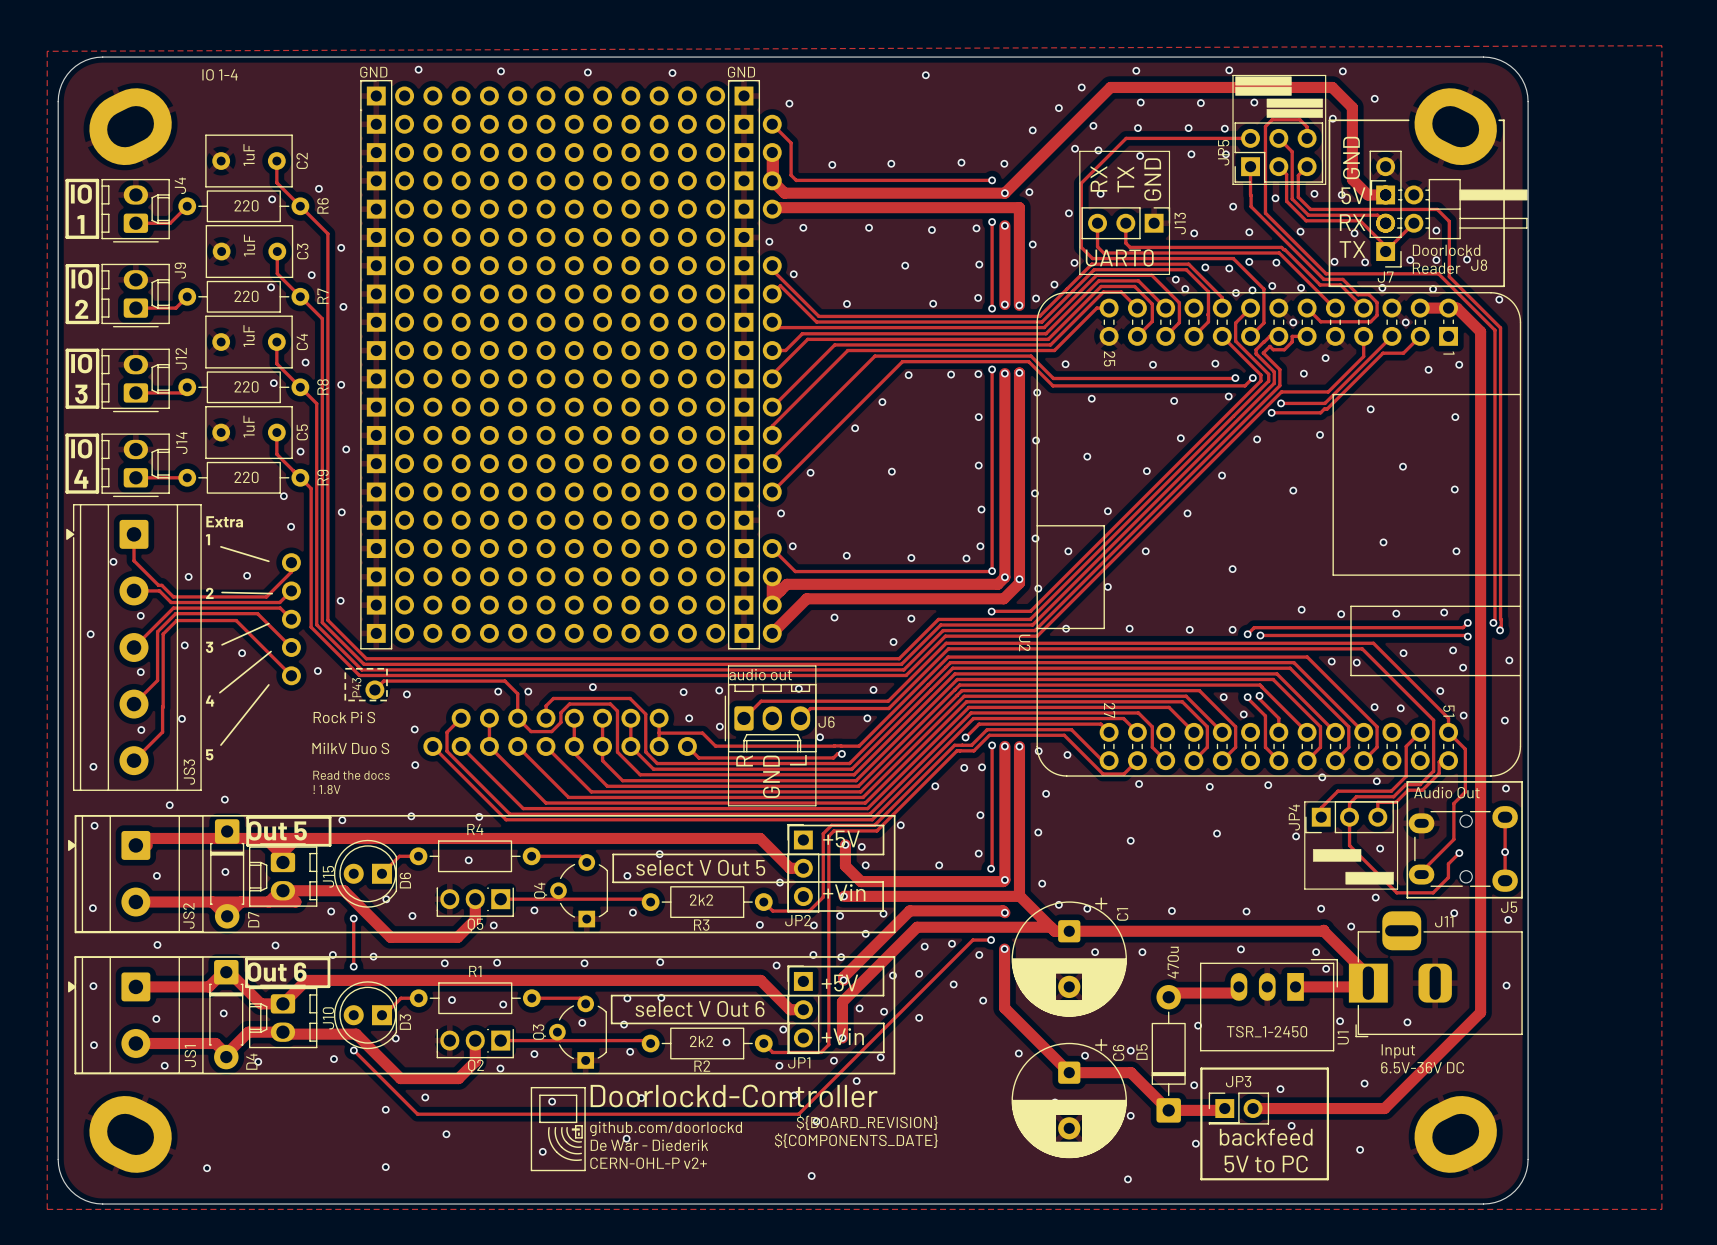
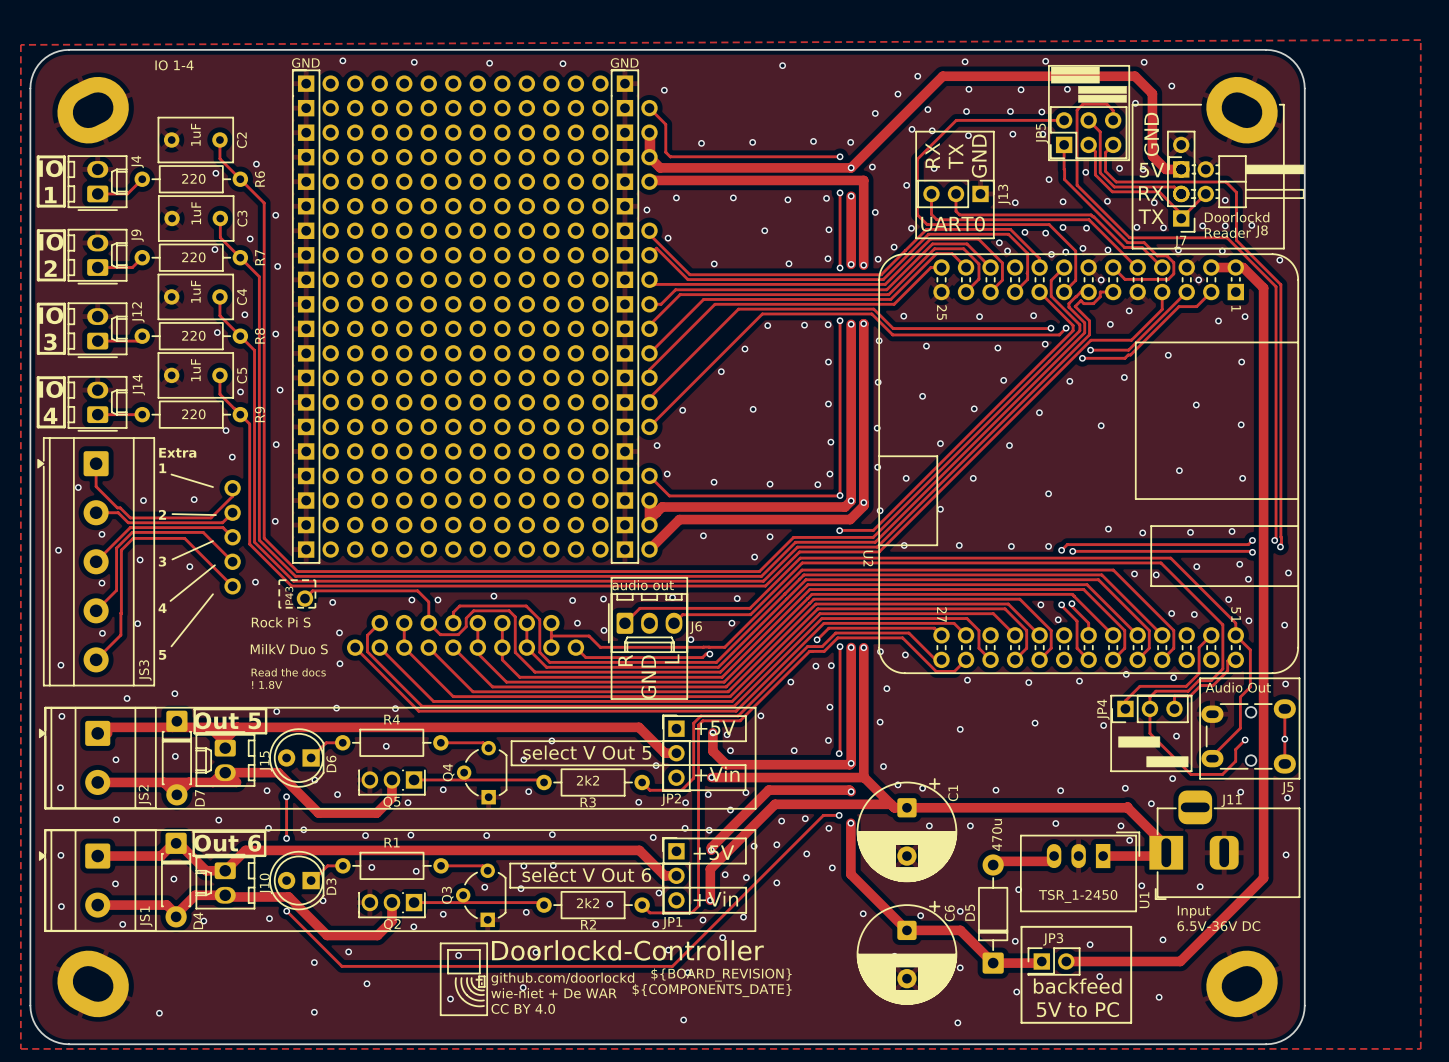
text: De War - Diederik (649, 1145) -> wie-niet + De WAR (553, 993)
text: CERN-OHL-P v2+ (648, 1163) -> CC BY 4.0 (523, 1008)

